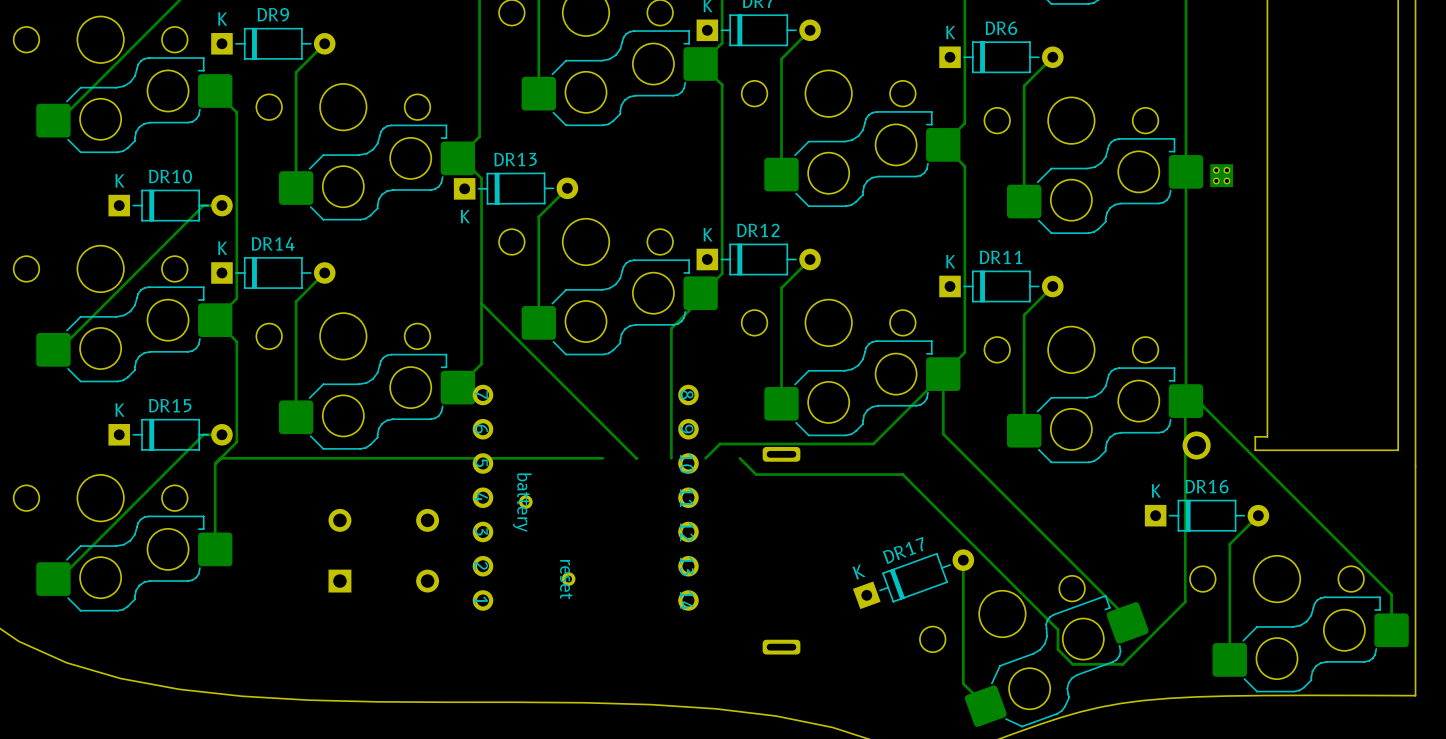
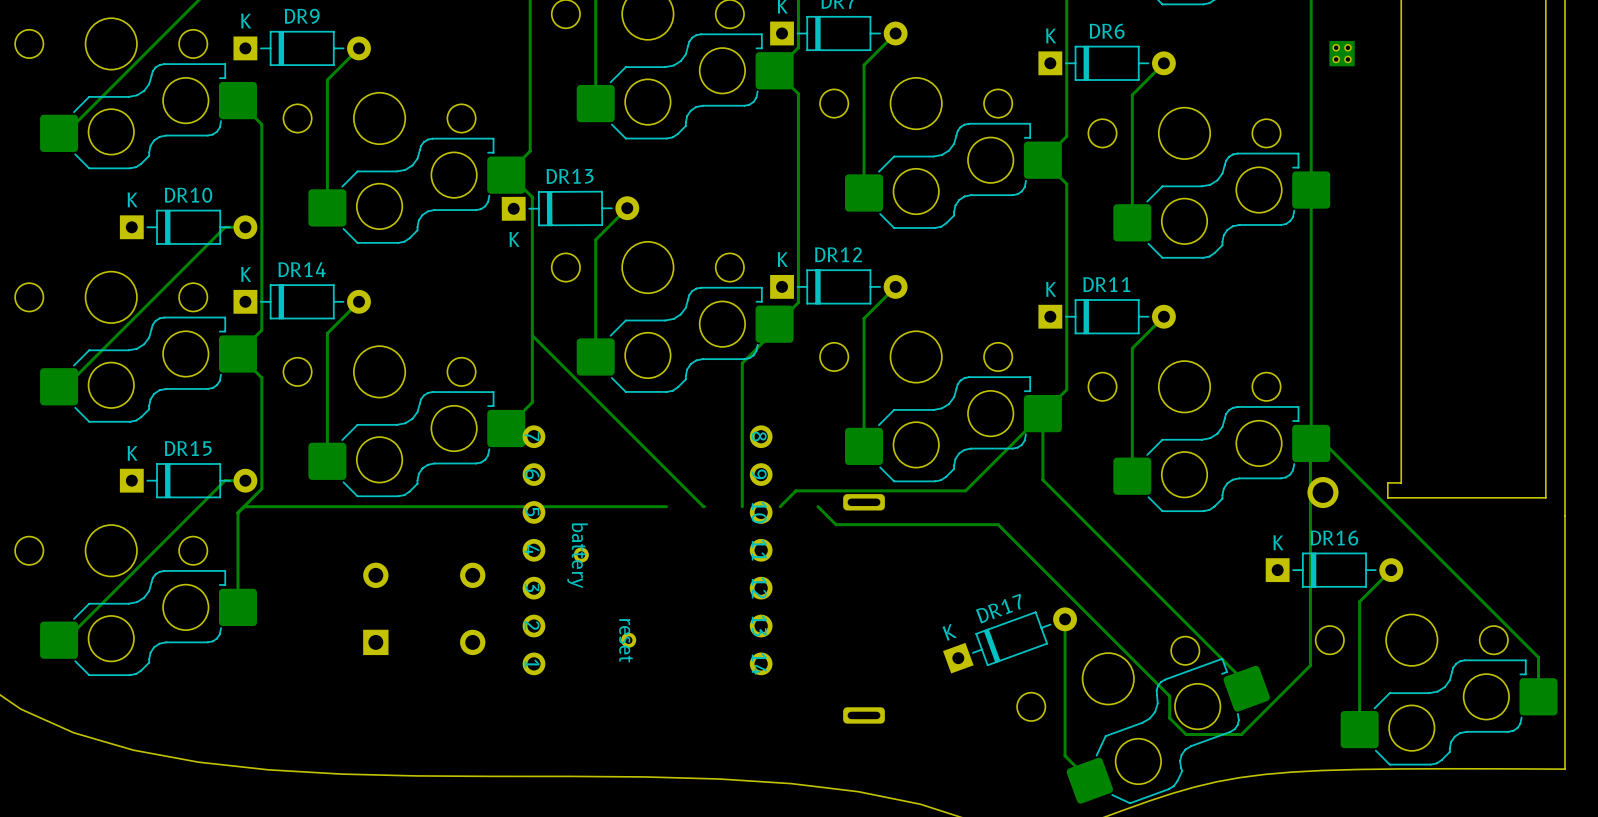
part position: (1221, 175) -> (1342, 53)

